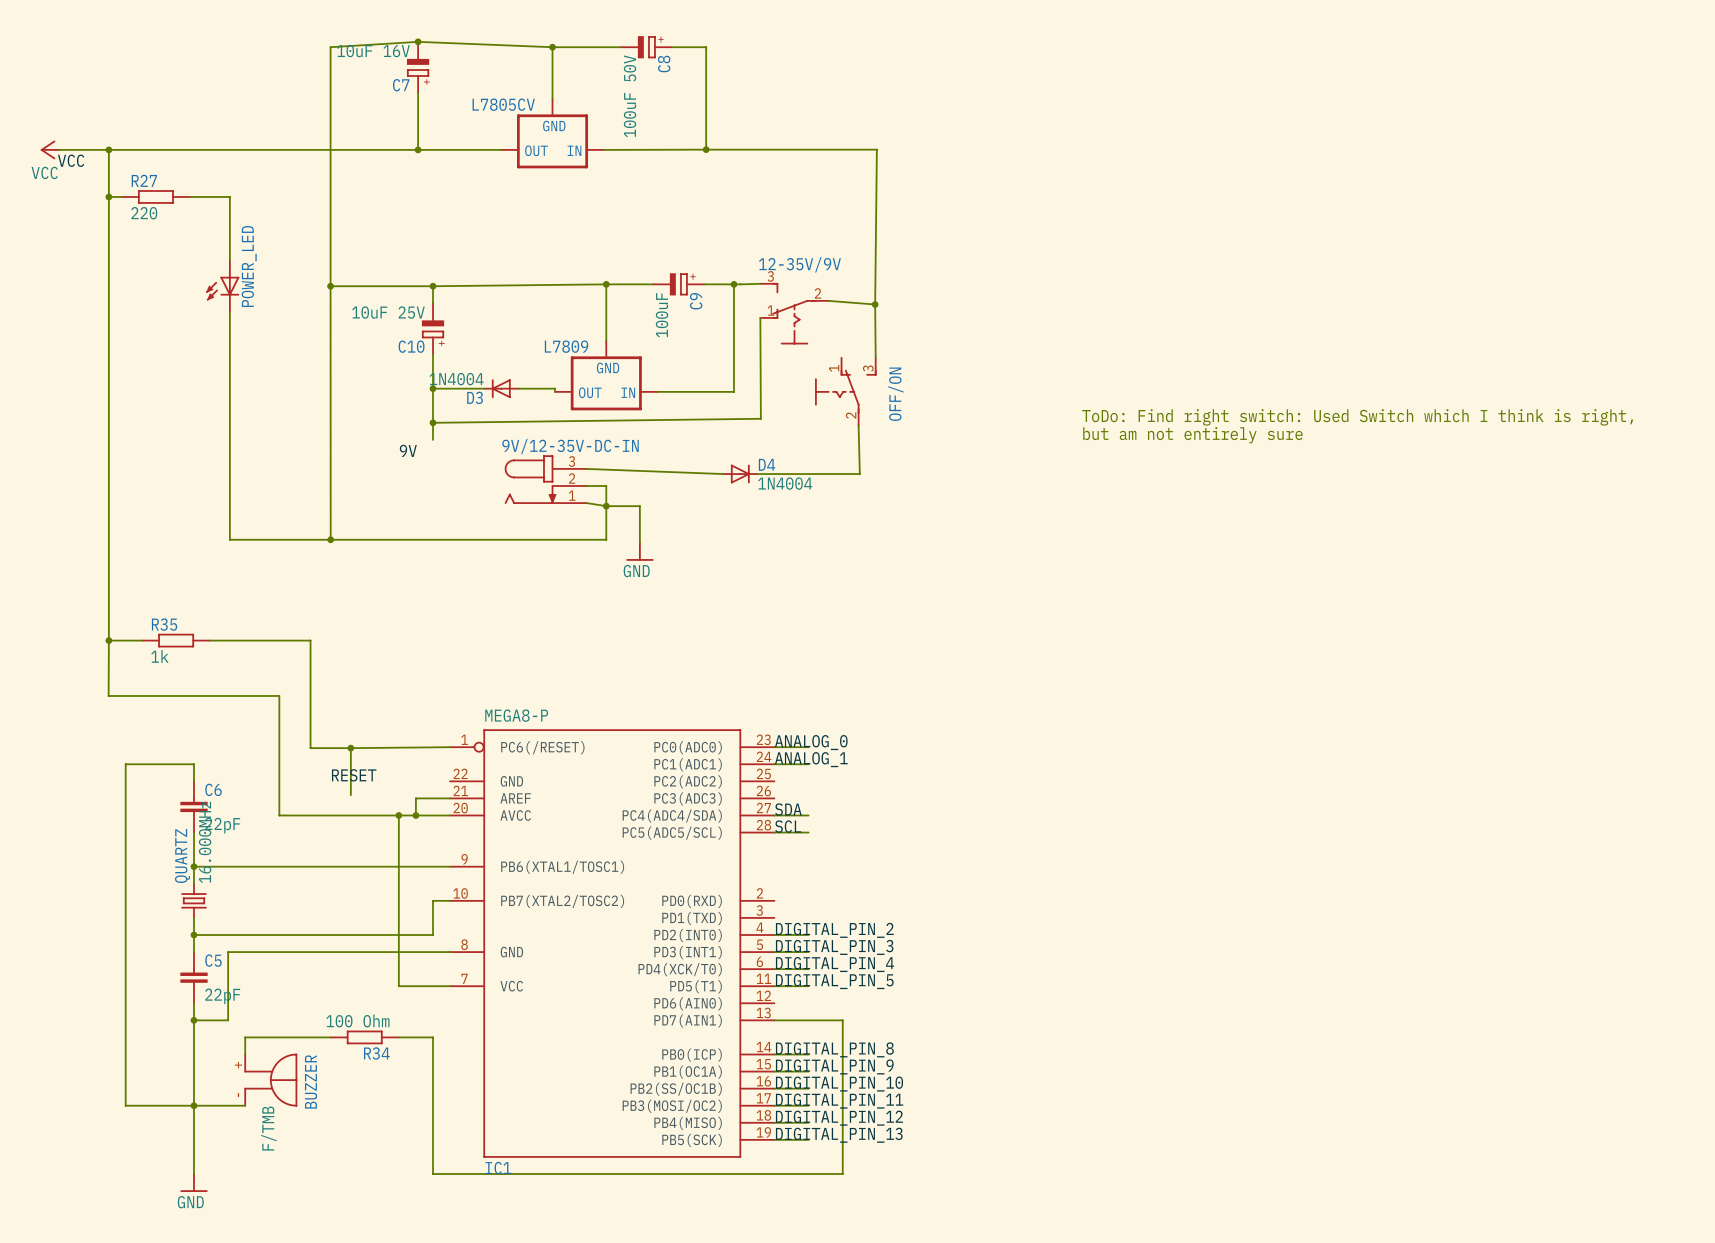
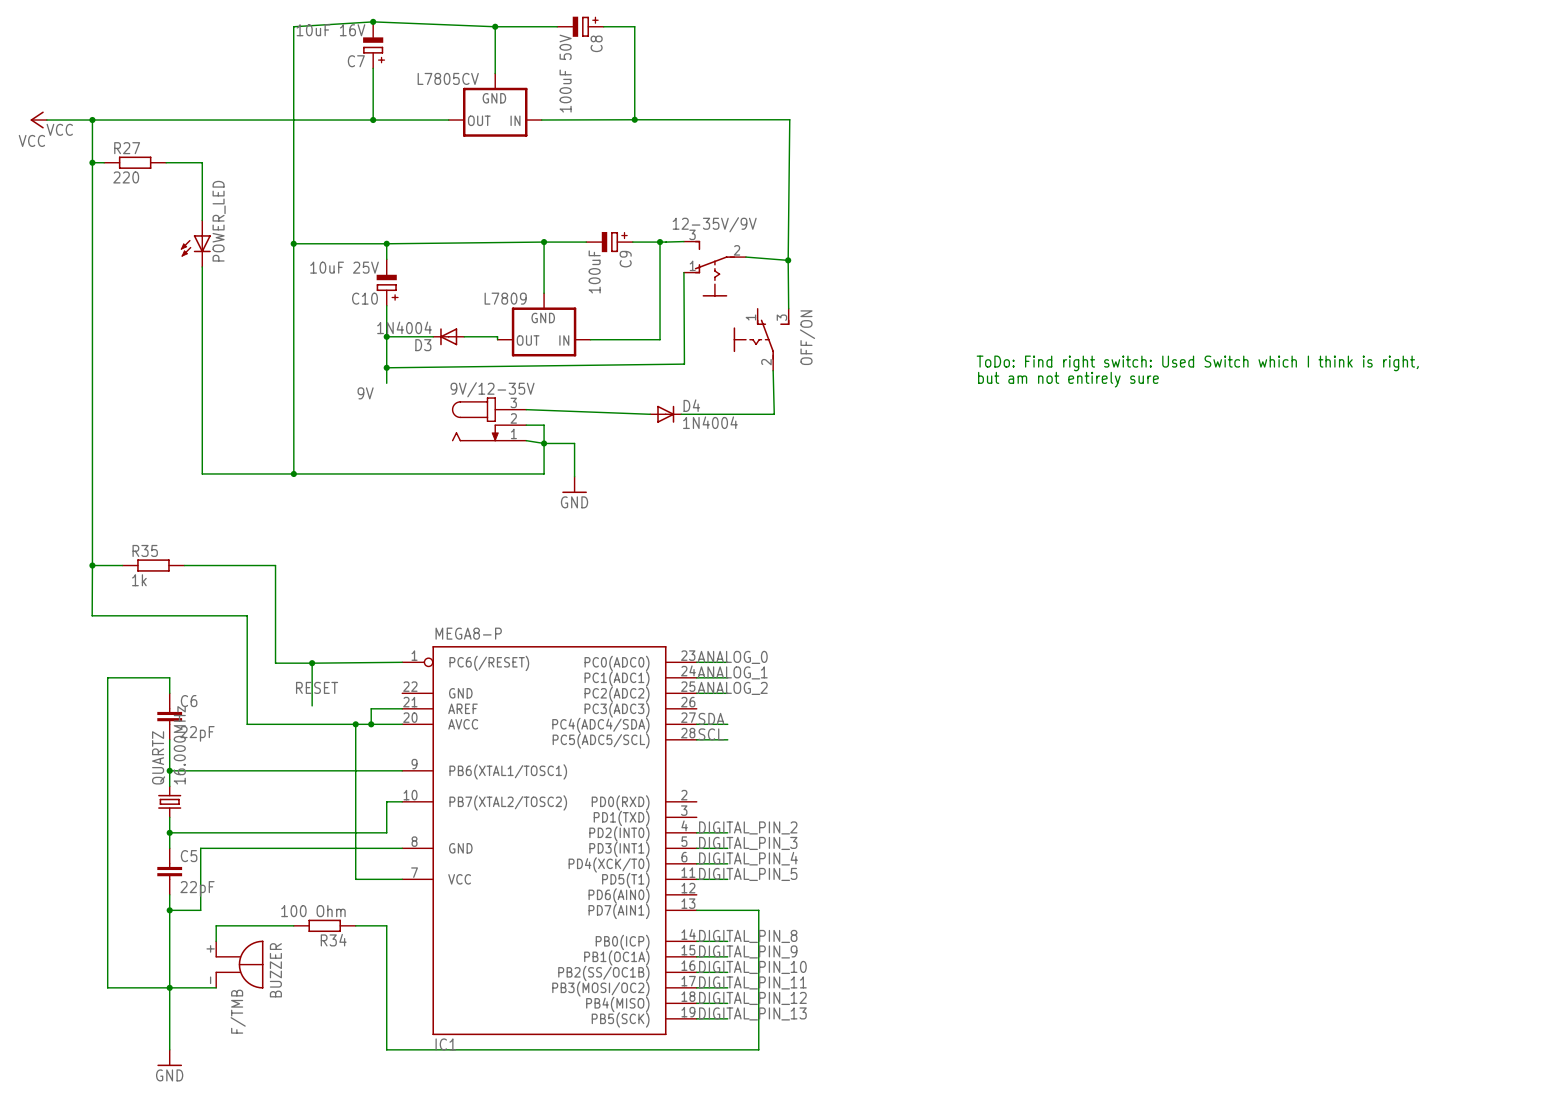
9V/12-35V-DC-IN name: 9V/12-35V-DC-IN (570, 446) -> 9V/12-35V (492, 389)
label: none -> ANALOG_2 (732, 688)
wire: none -> (696, 693) (727, 693)

